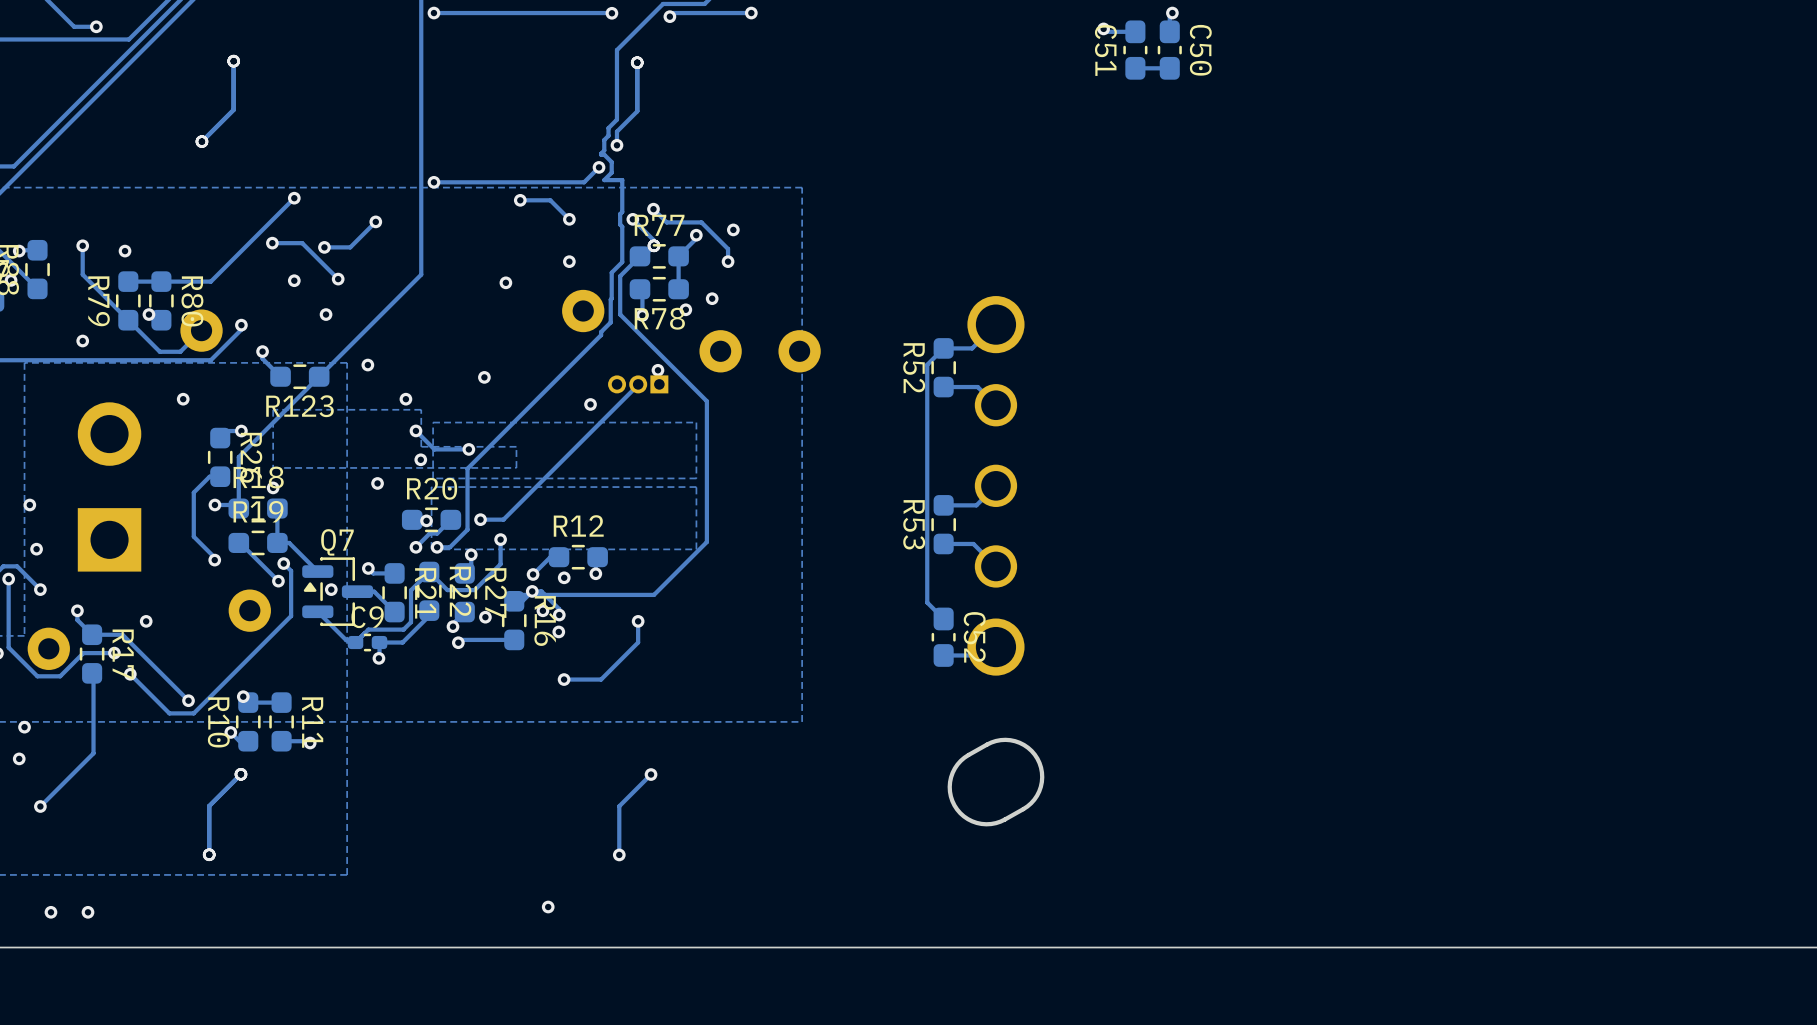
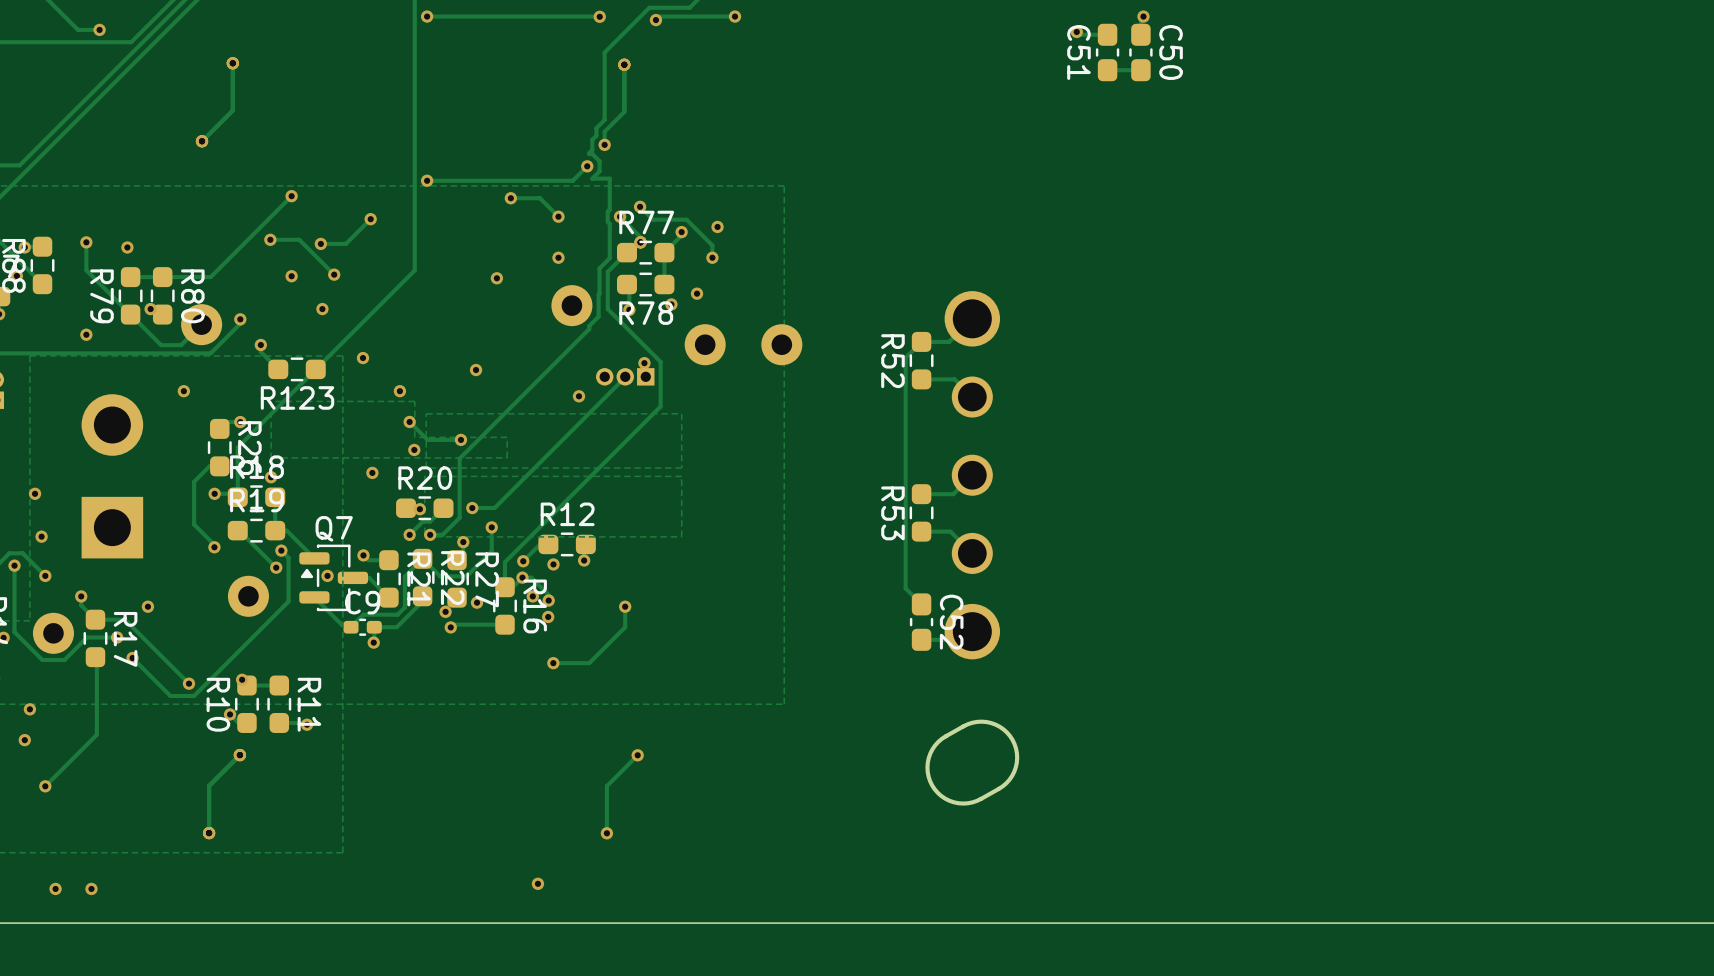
track: (674, 369) (706, 401) (706, 542) (654, 594) (520, 594) (514, 601) -> (660, 361) (660, 406) (505, 562) (505, 587)

